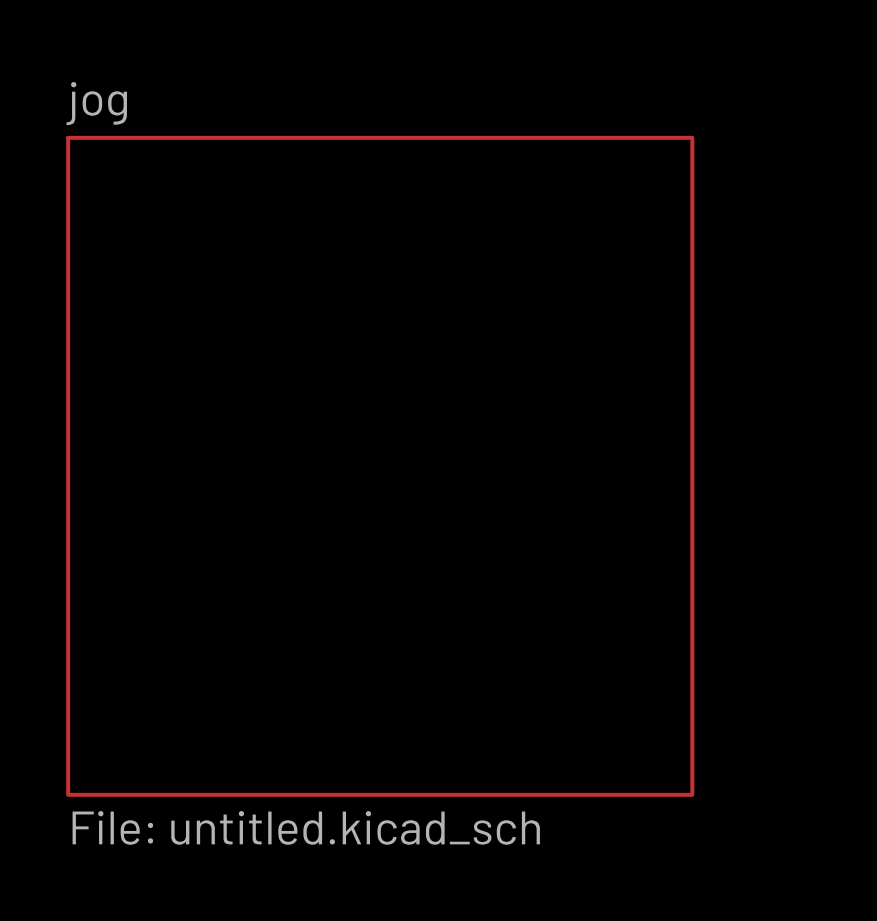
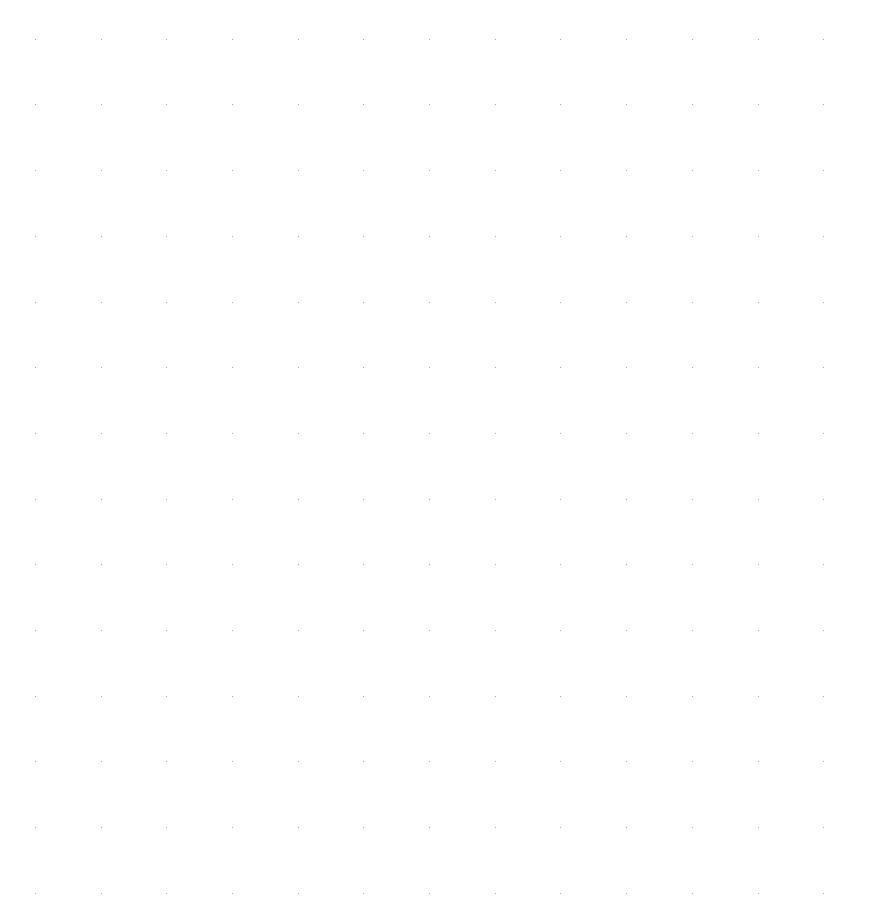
sheet jog: File: untitled.kicad_sch (380, 466) -> none

